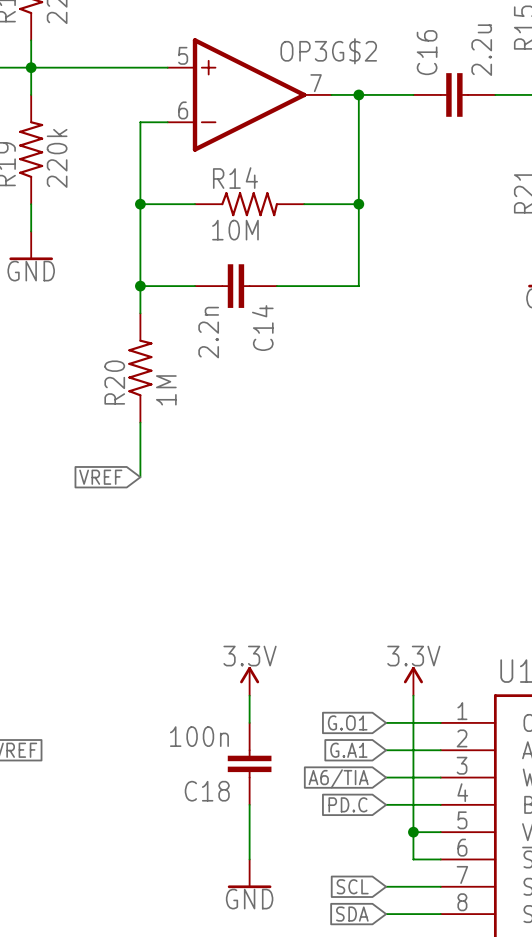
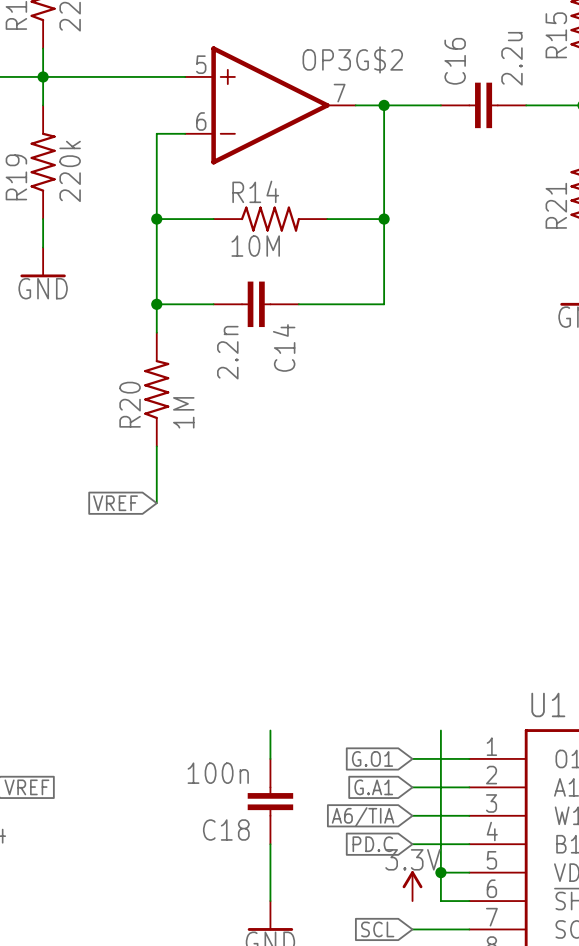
power symbol: 3.3V (249, 681) -> none
power symbol: 3.3V (413, 681) -> none
power symbol: none -> 3.3V (412, 886)

